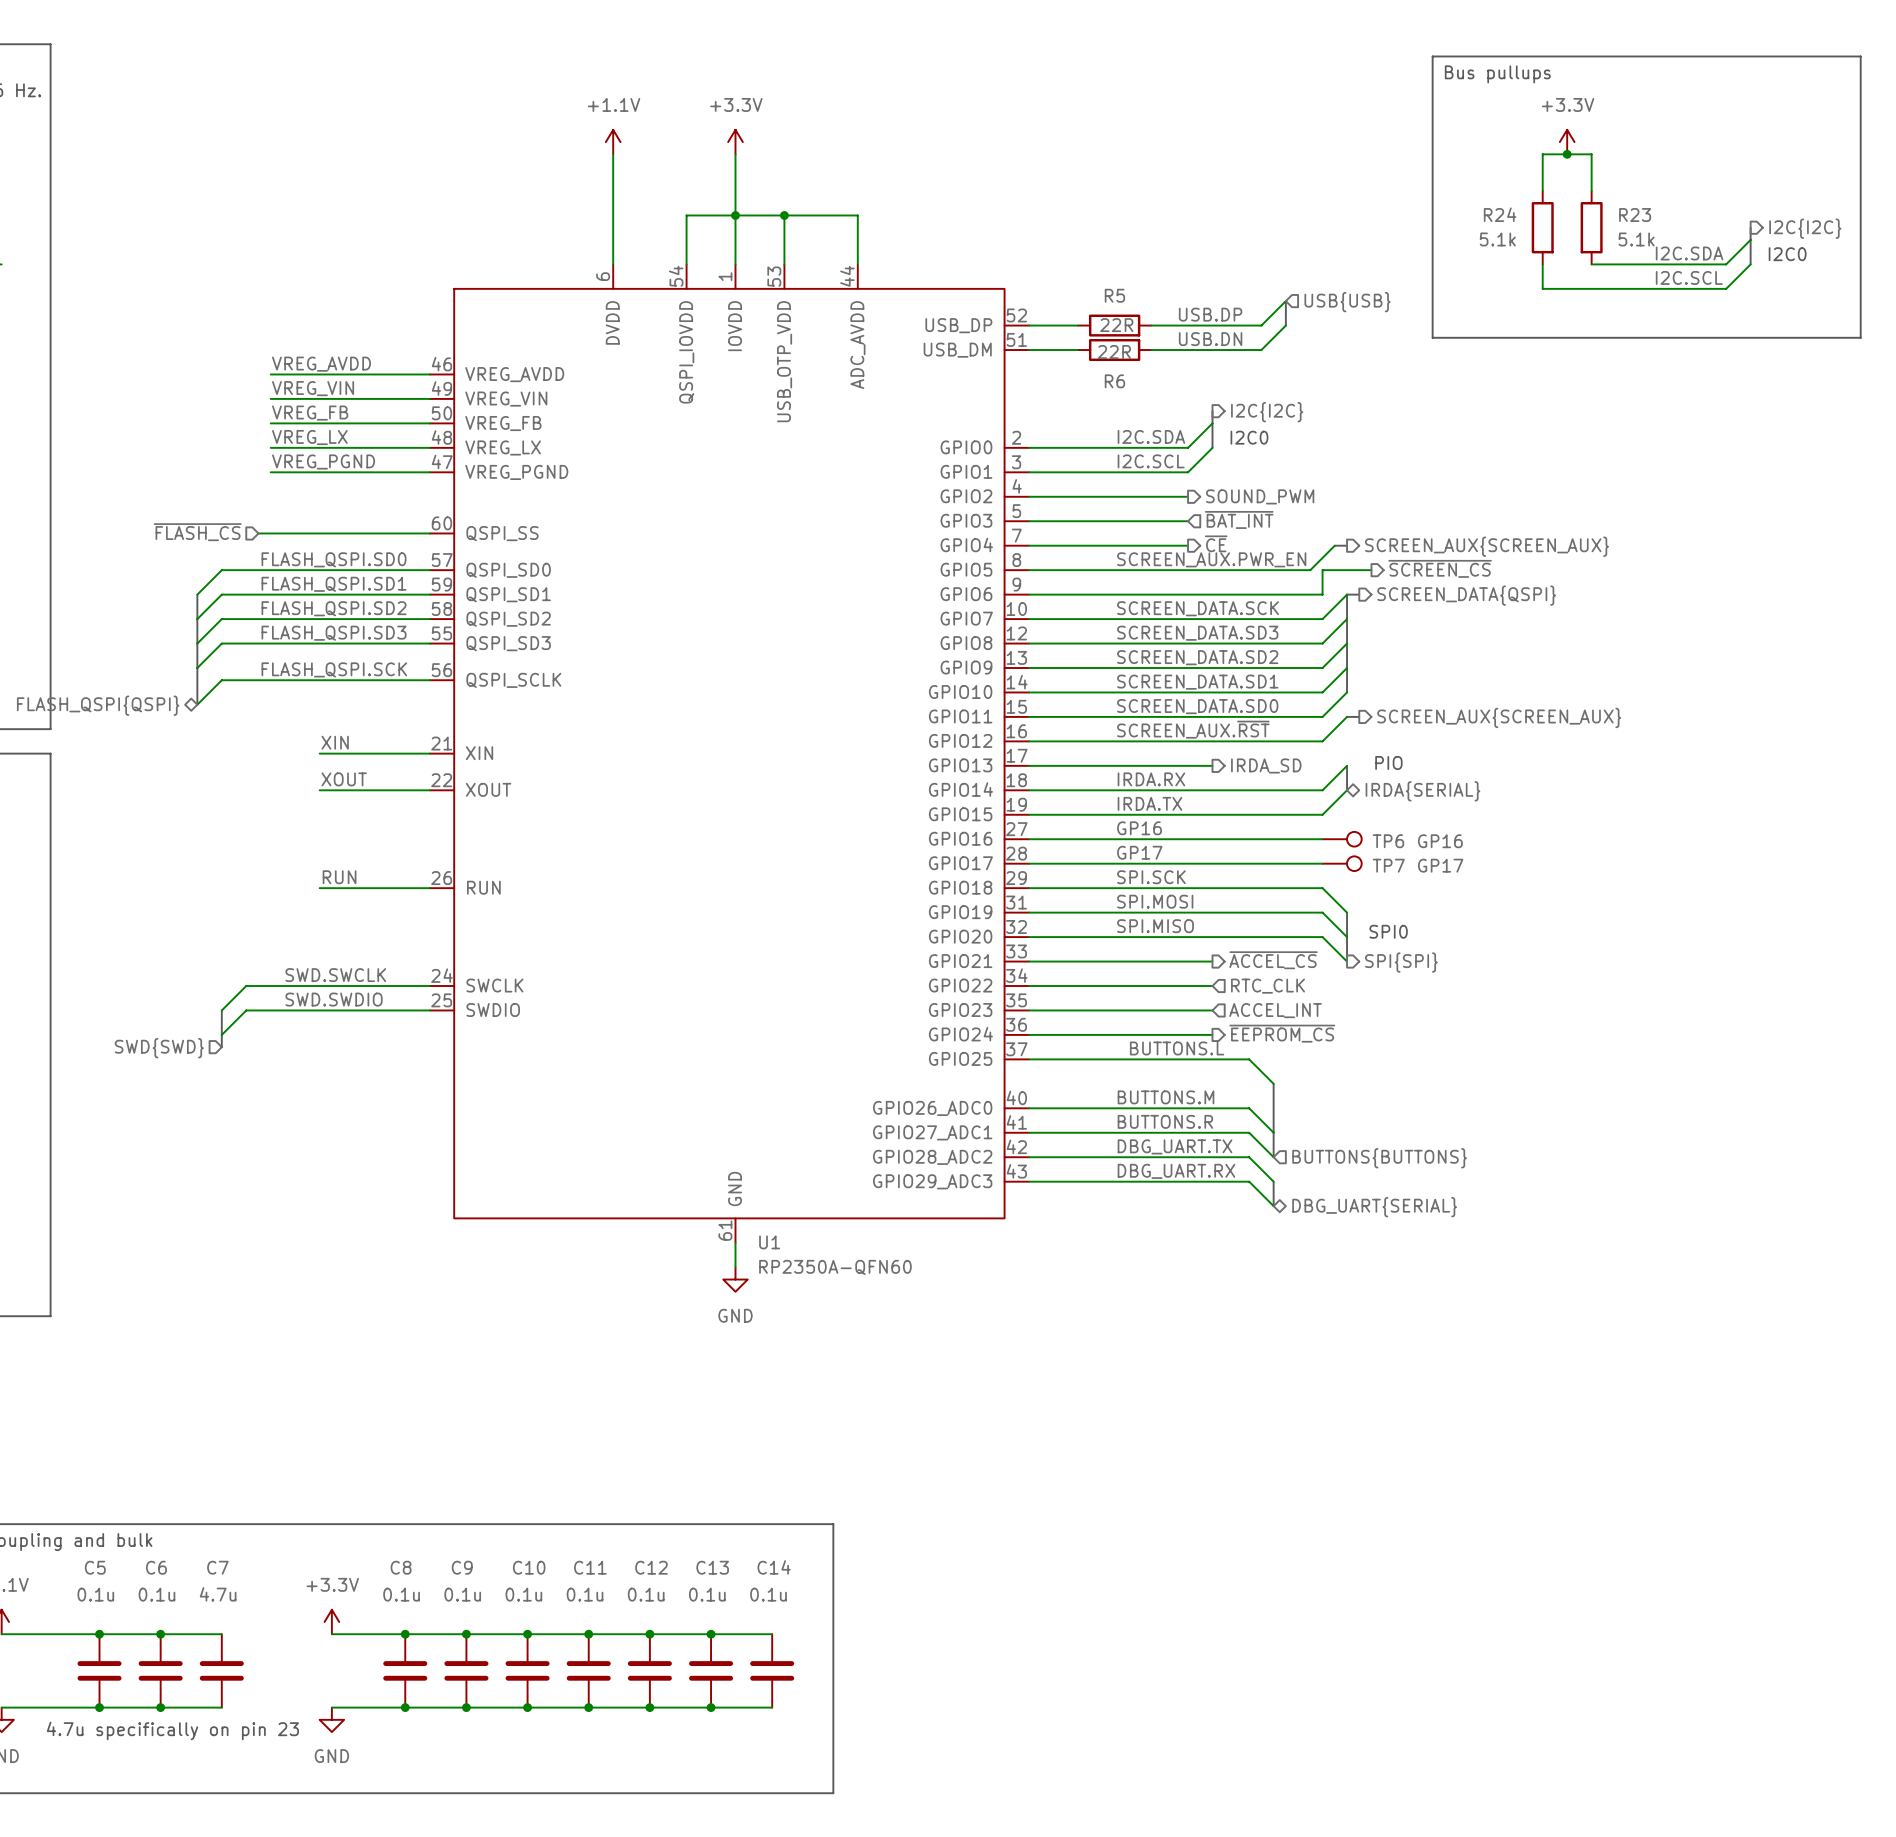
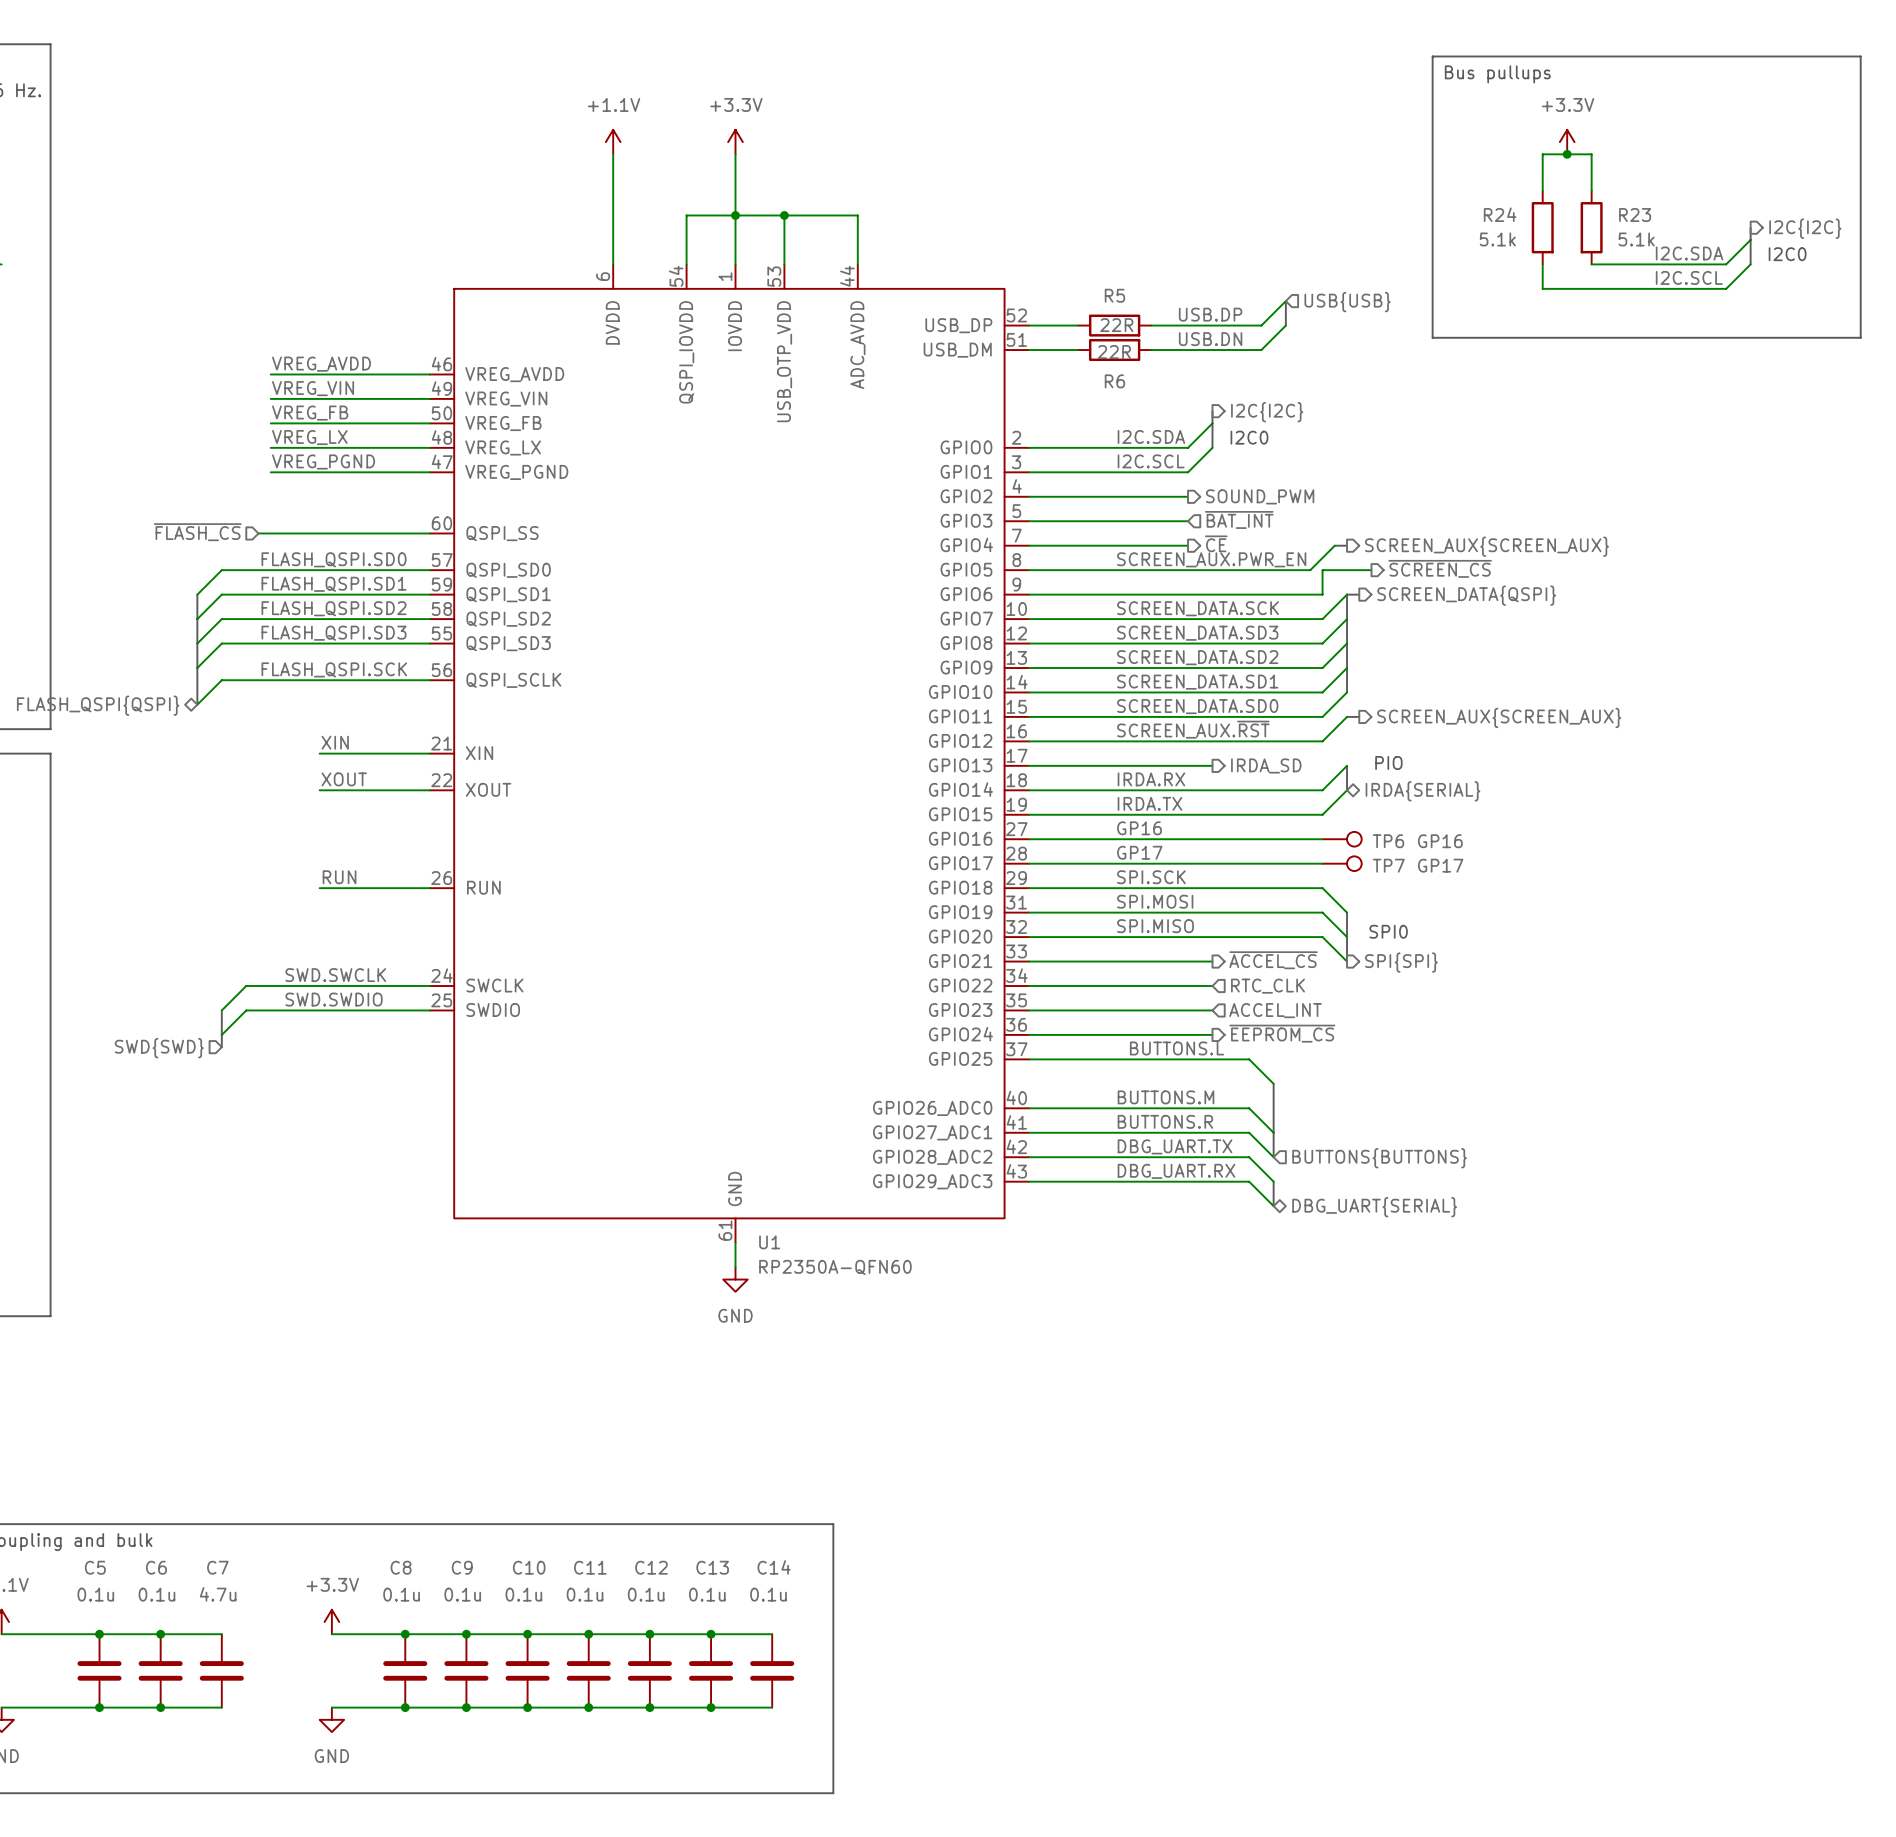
text: 4.7u specifically on pin 23 (172, 1730) -> none

